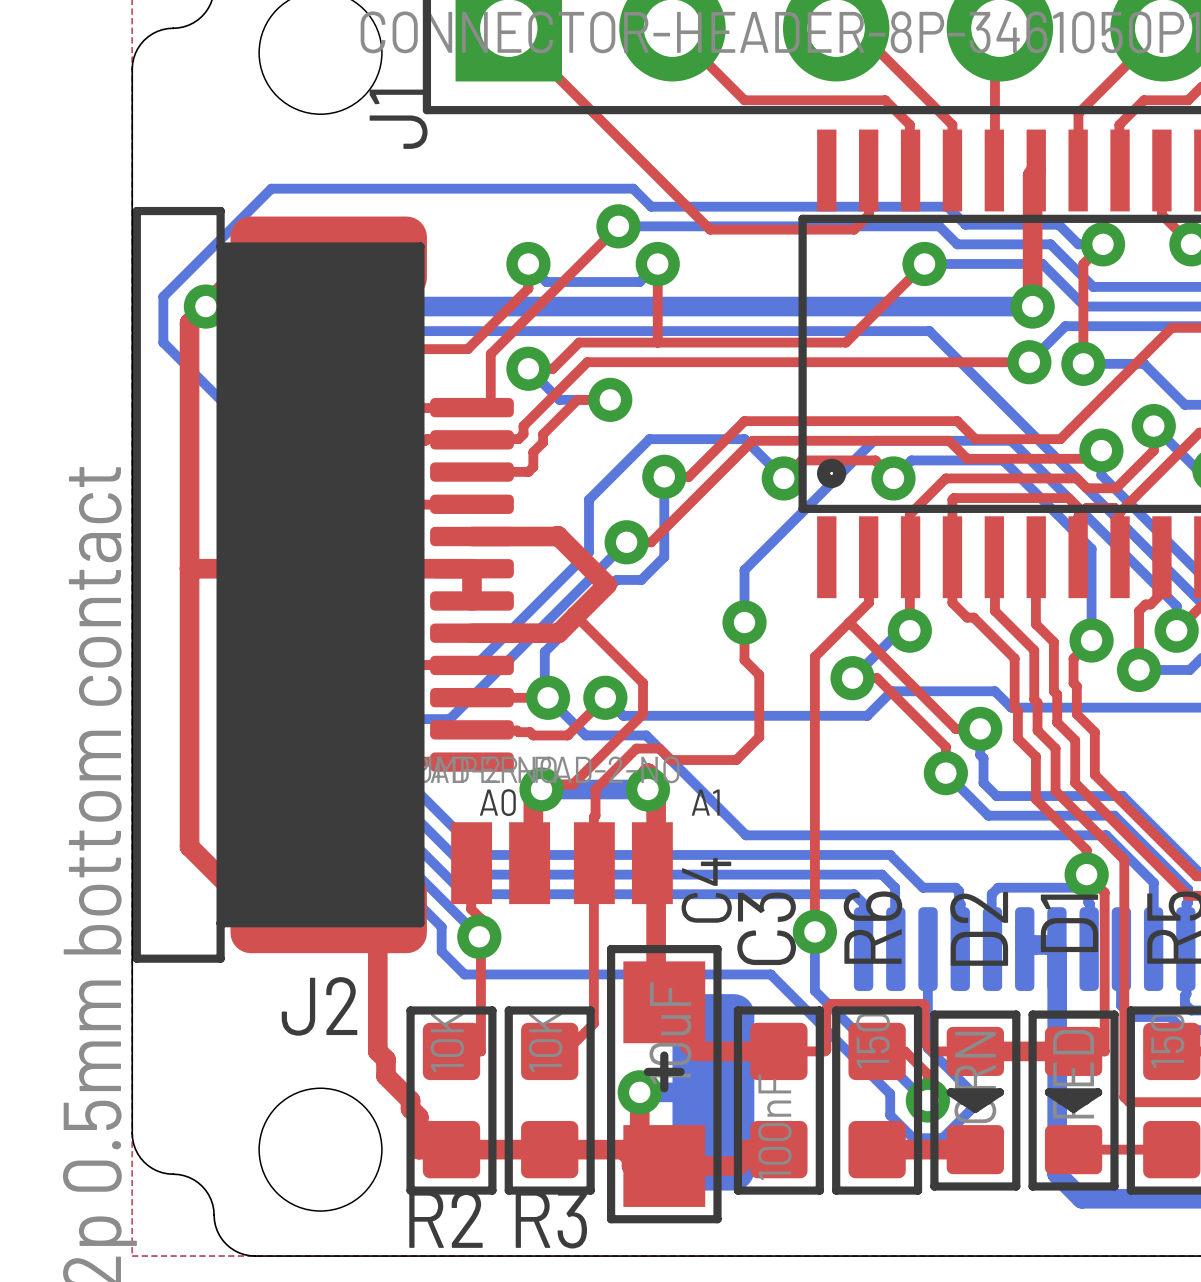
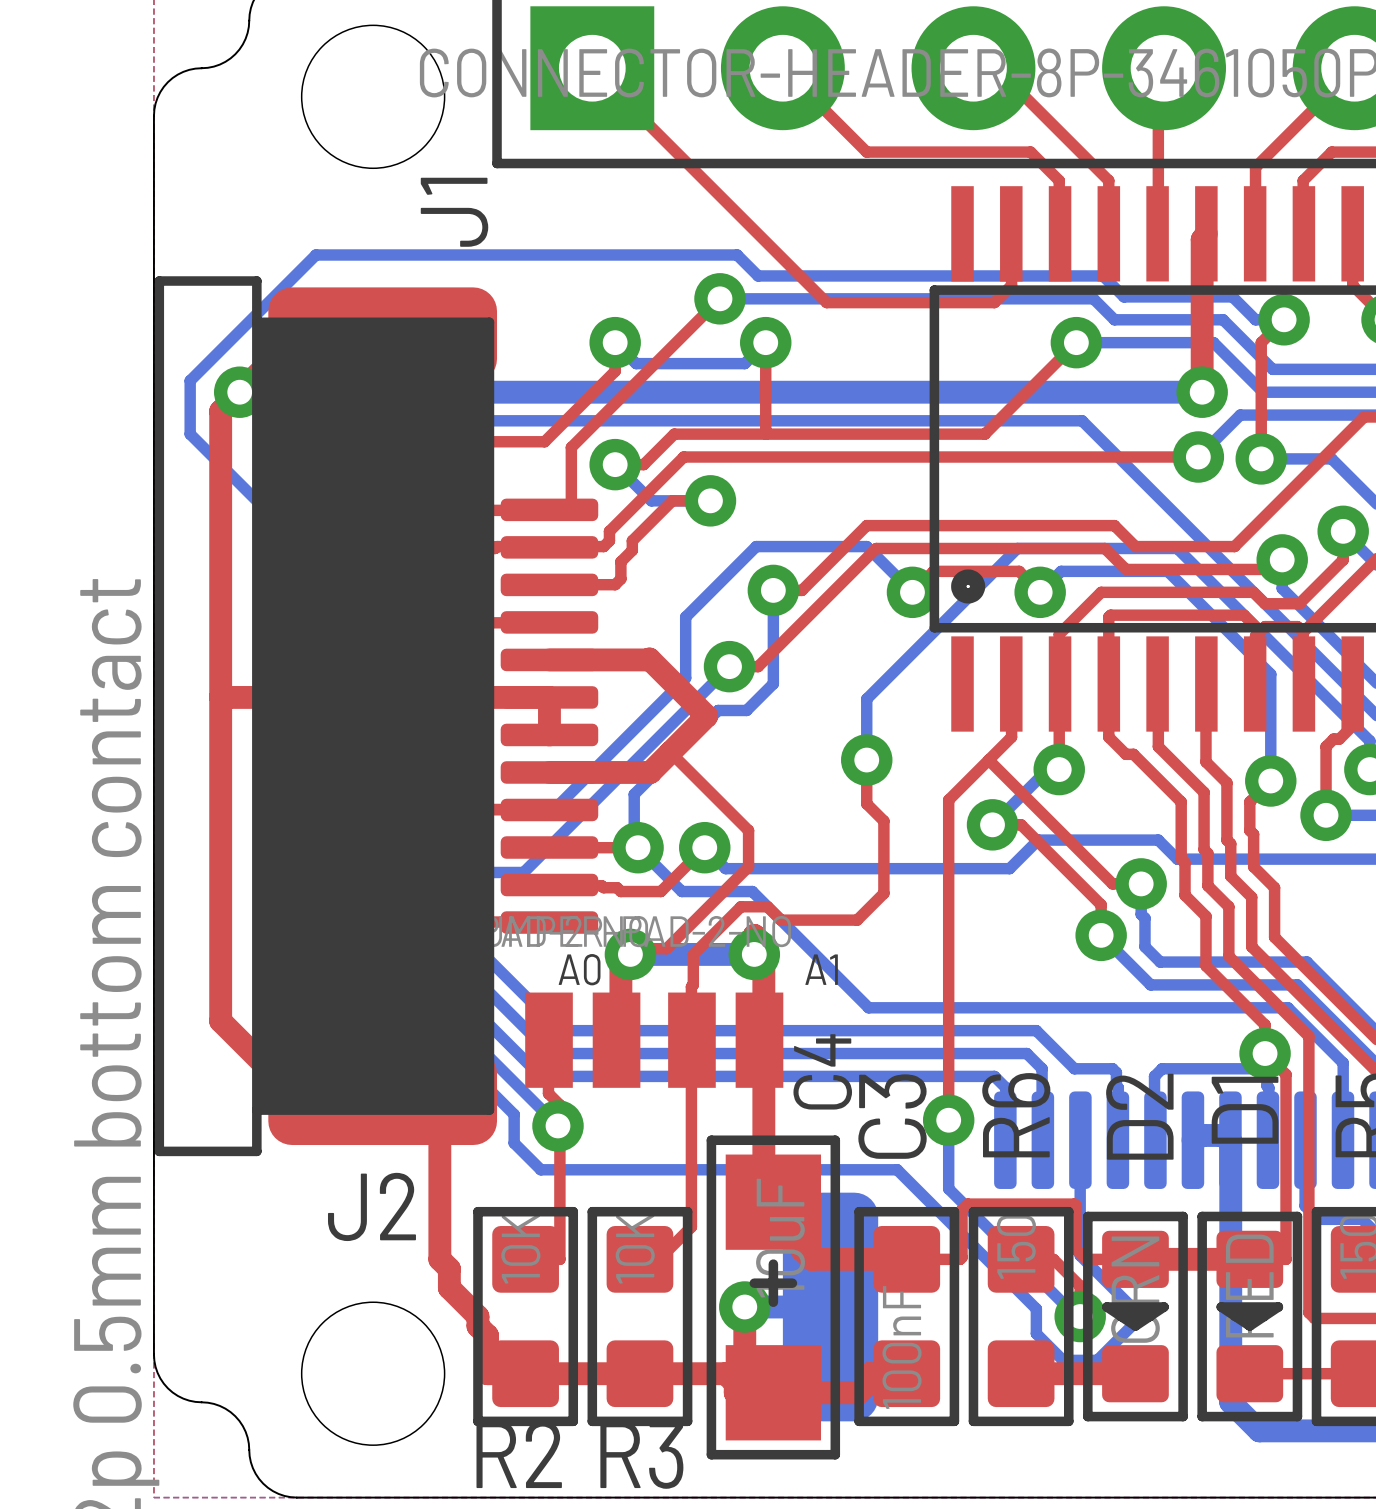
J1 name position: J1 (398, 119) -> J1 (454, 212)

